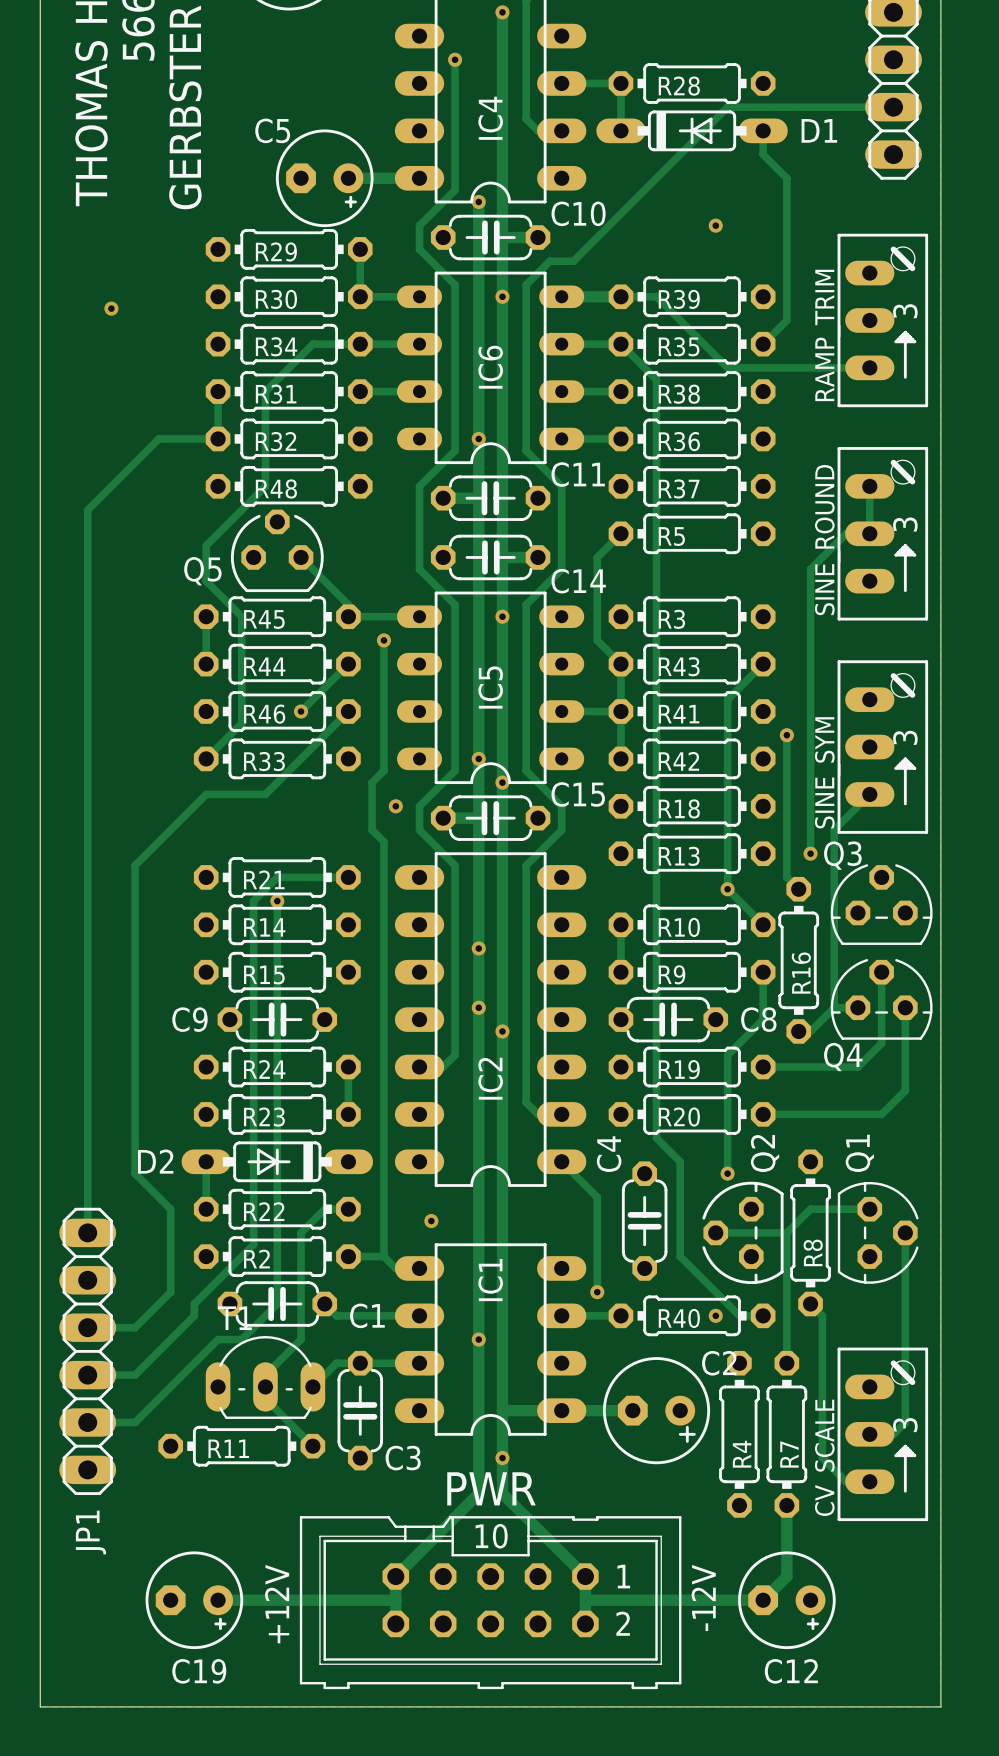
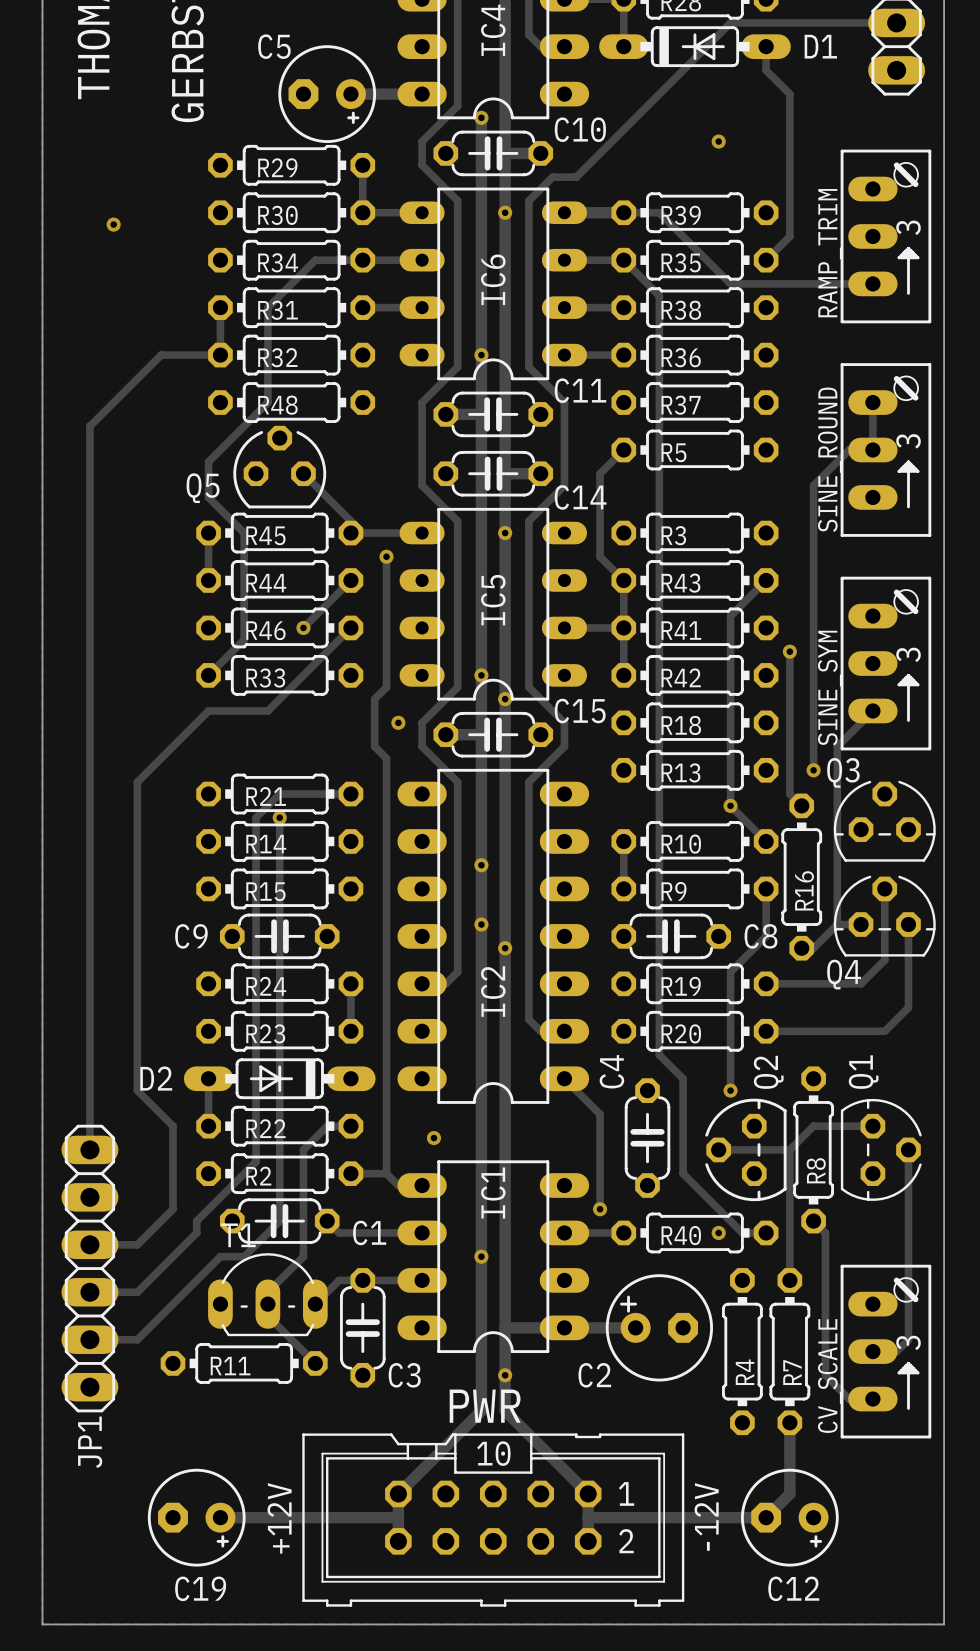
C2 rotation: 0° (656, 1410) -> 180° (659, 1327)

